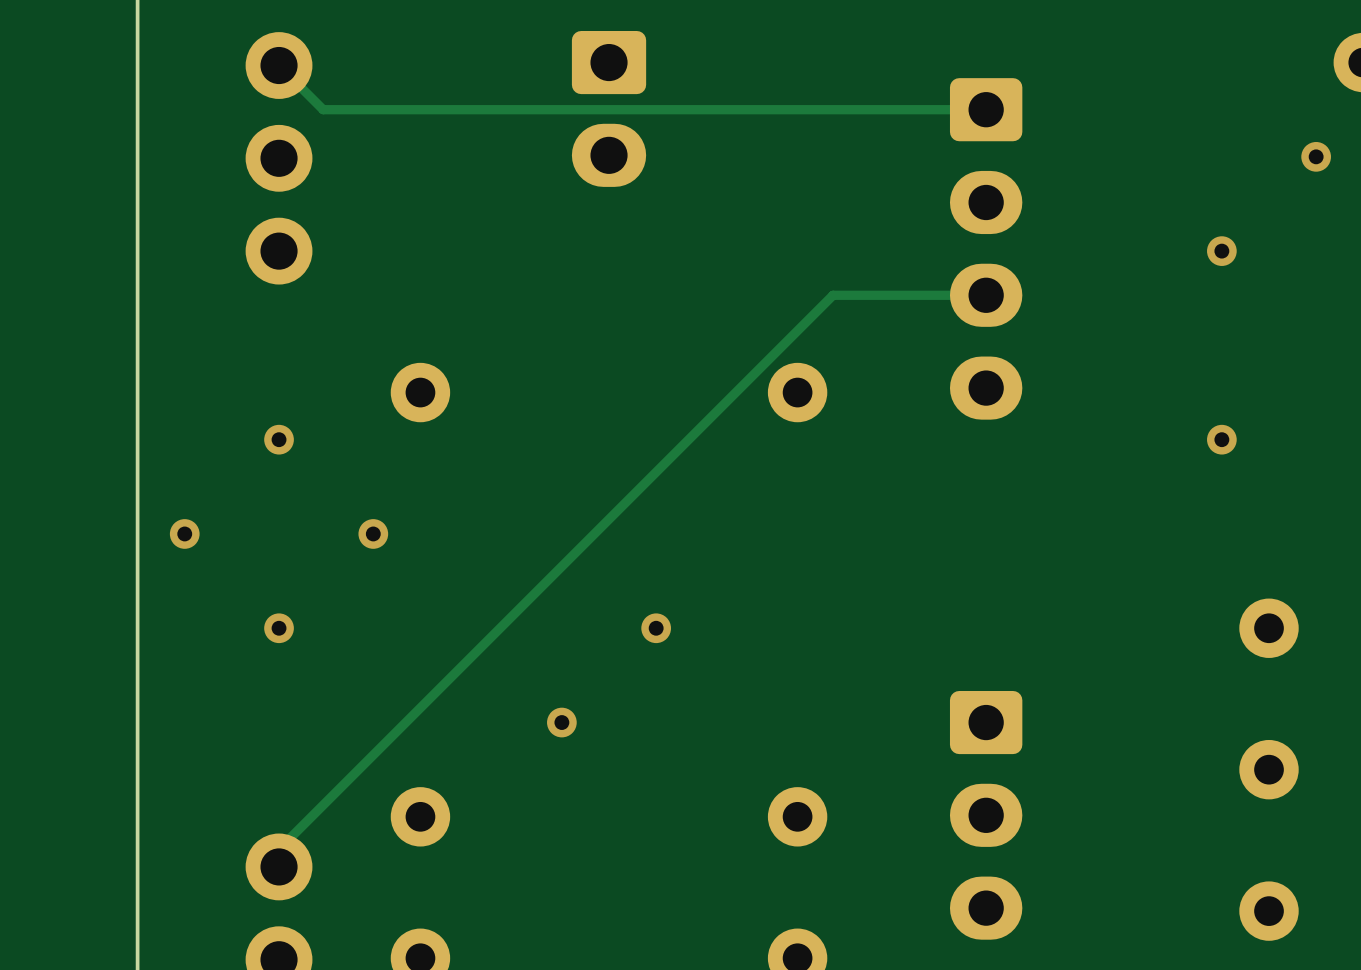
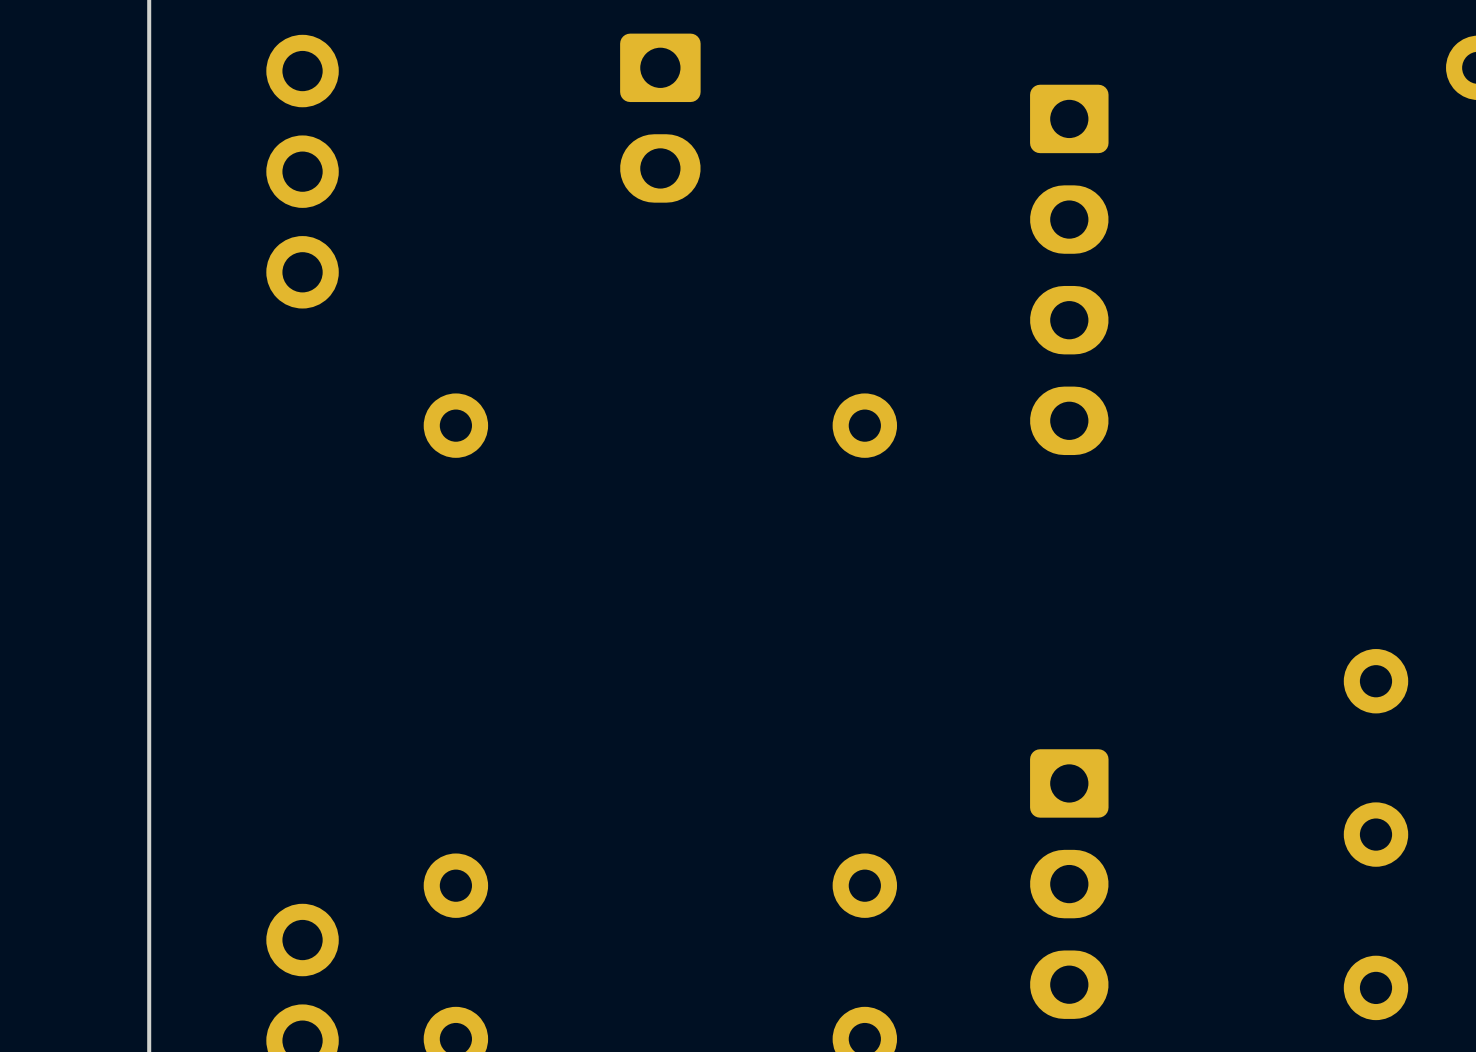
track: (279, 65) (323, 109) (986, 109) -> none
via: (1316, 156) -> none
via: (1221, 251) -> none
track: (986, 295) (833, 295) (279, 849) (279, 866) -> none
via: (279, 439) -> none
via: (1221, 439) -> none
via: (184, 533) -> none
via: (373, 533) -> none
via: (279, 628) -> none
via: (656, 628) -> none
via: (561, 722) -> none

